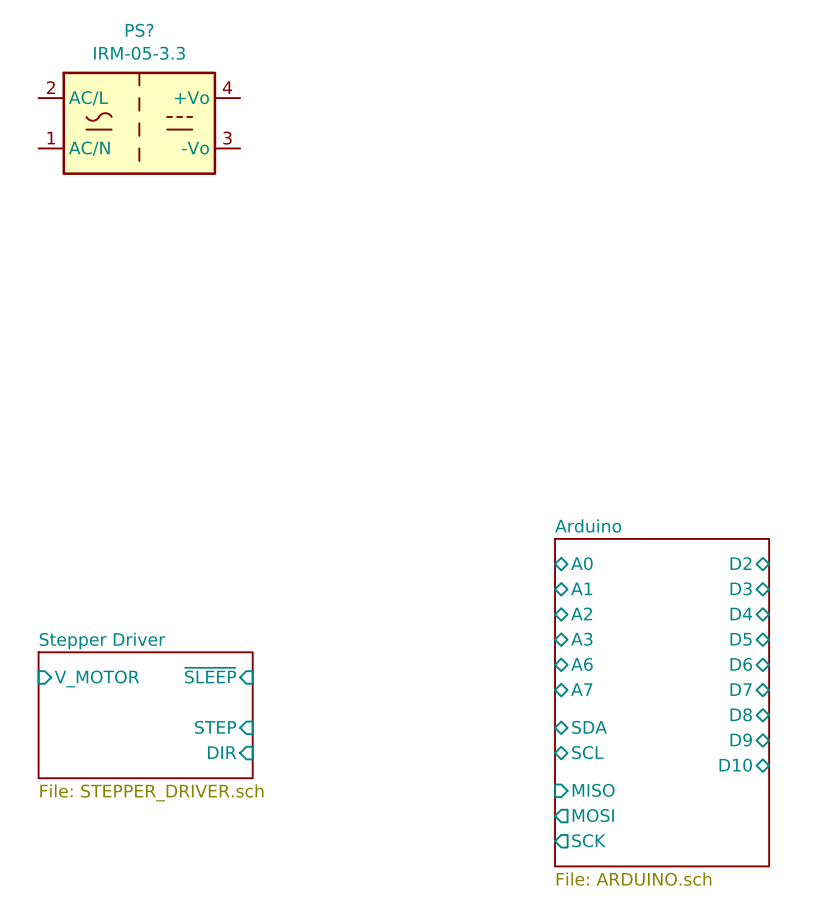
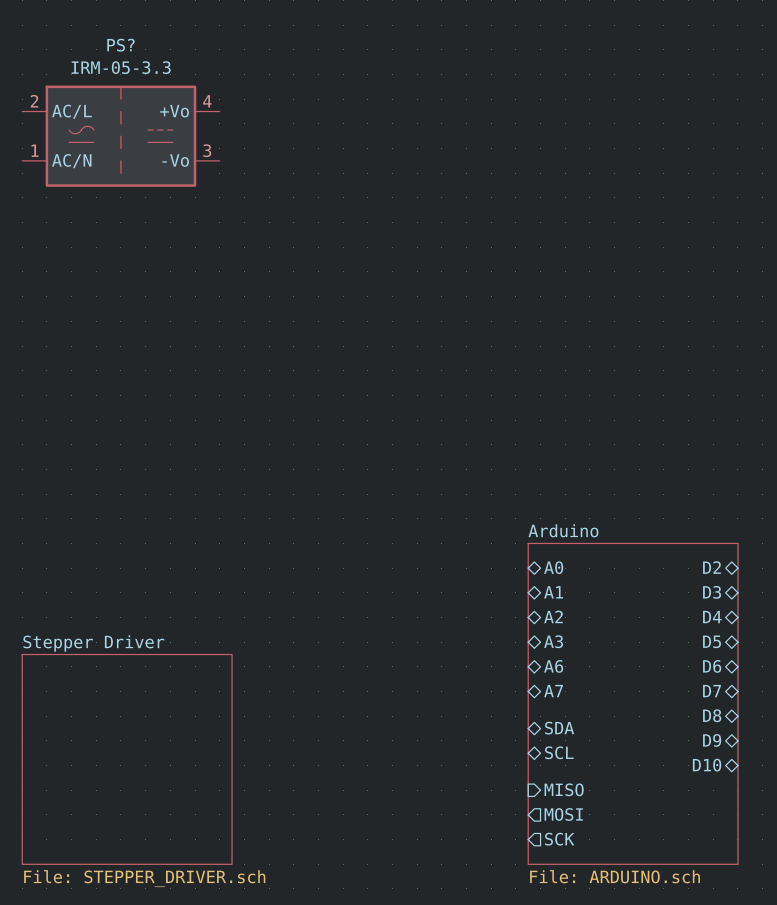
sheet pin: ~{SLEEP} (210, 675) -> none
sheet pin: V_MOTOR (96, 678) -> none
sheet Stepper Driver: File: STEPPER_DRIVER.sch (145, 715) -> none
sheet pin: STEP (215, 727) -> none
sheet pin: DIR (222, 752) -> none
sheet Stepper Driver: none -> File: STEPPER_DRIVER.sch (127, 759)

